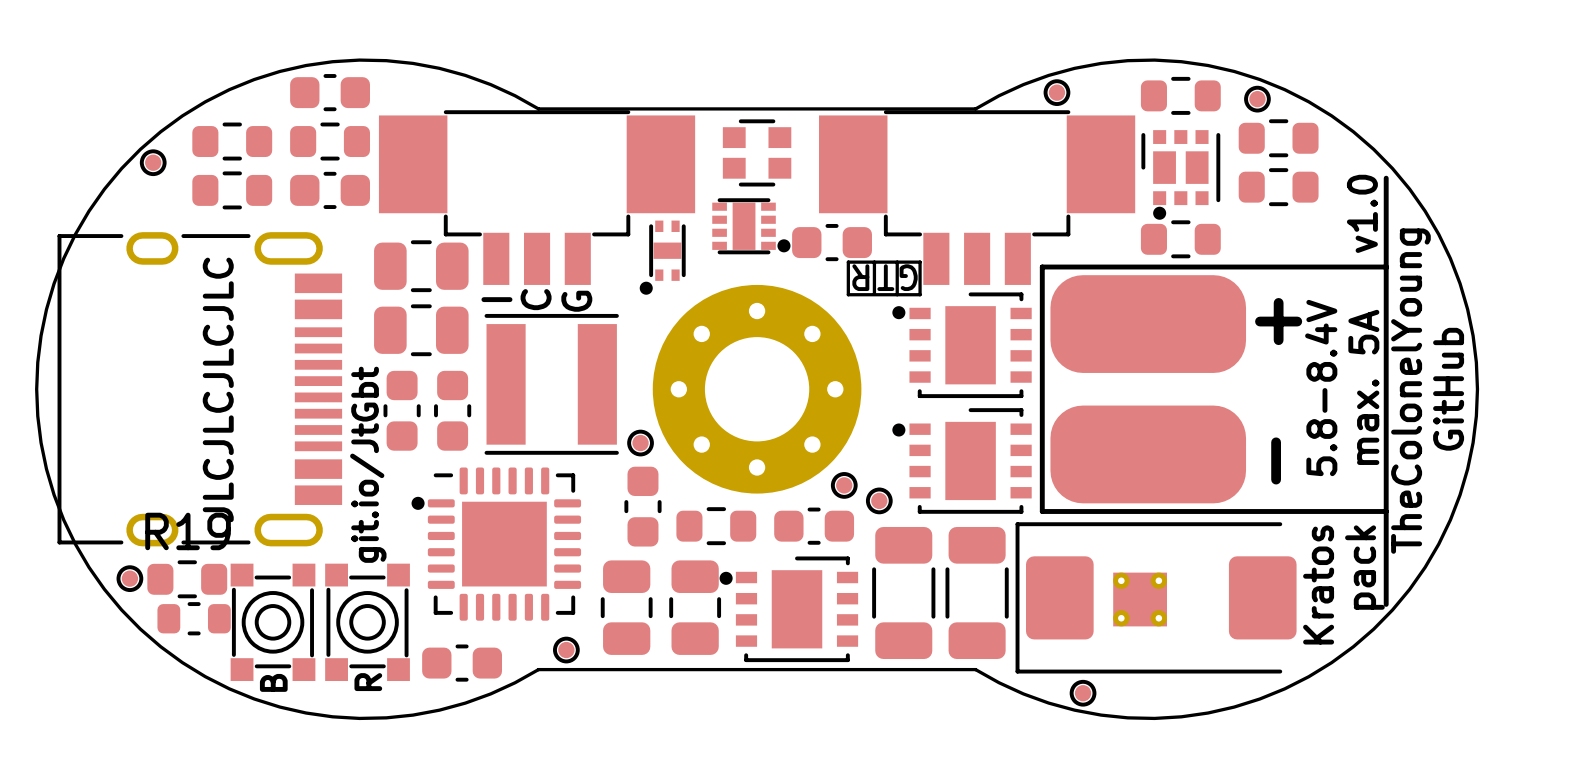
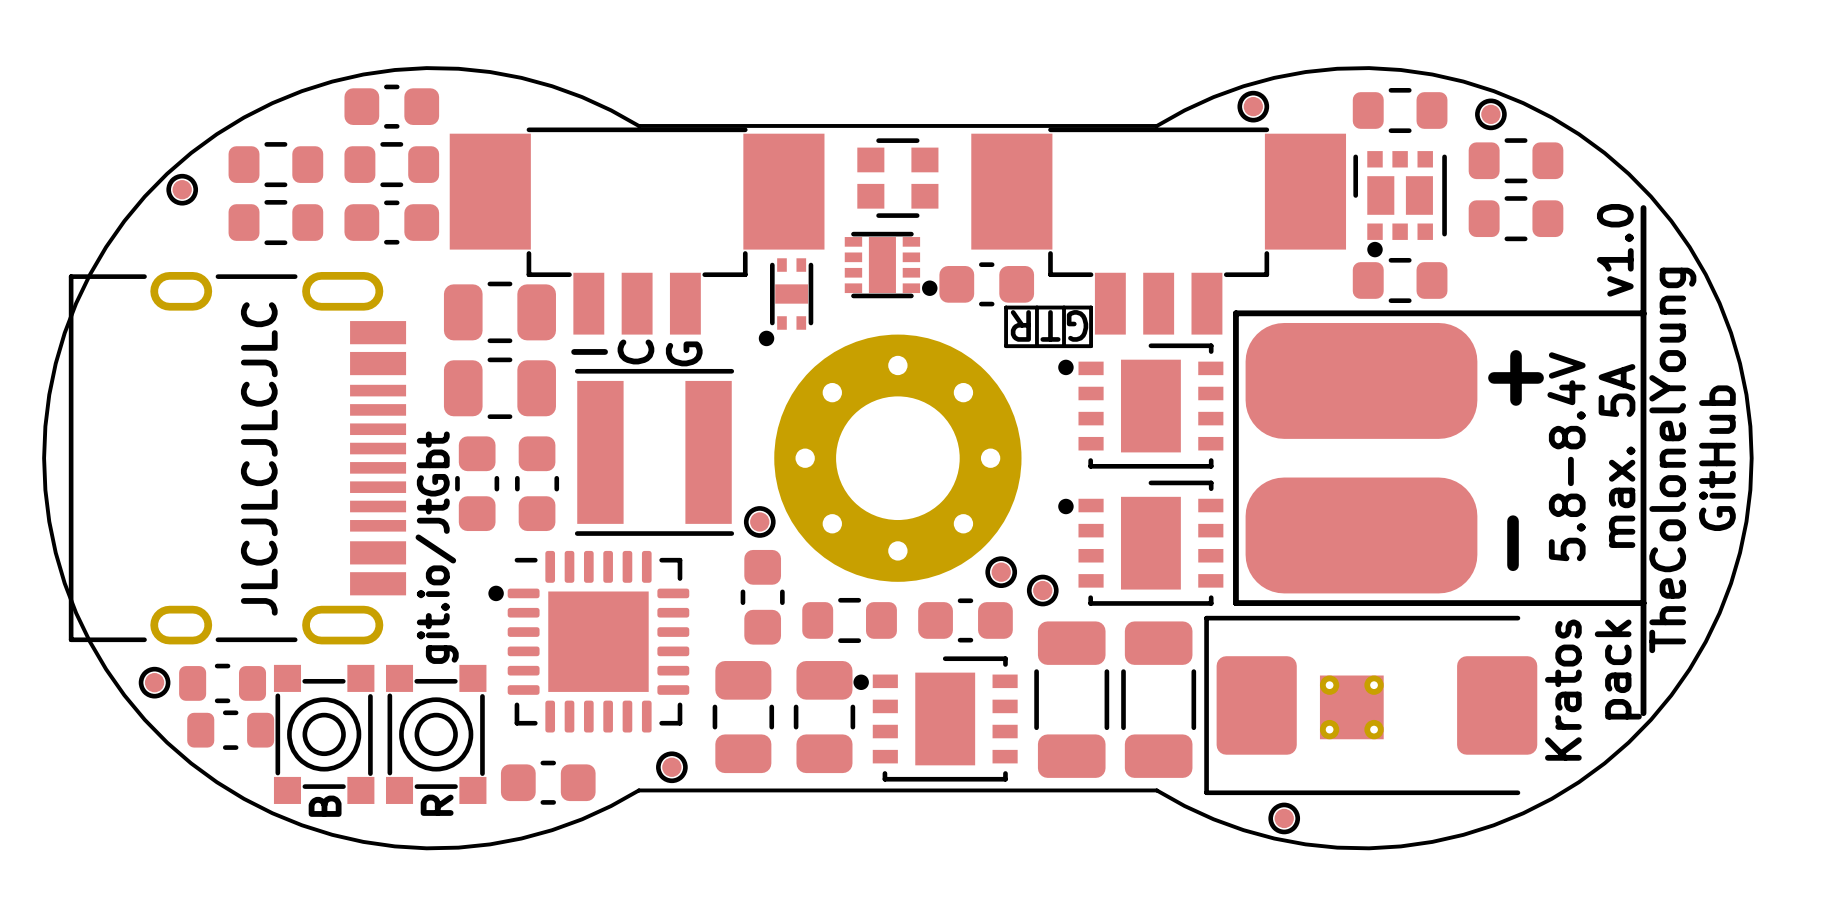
R19: (187, 579) -> none
part: none -> (222, 683)

